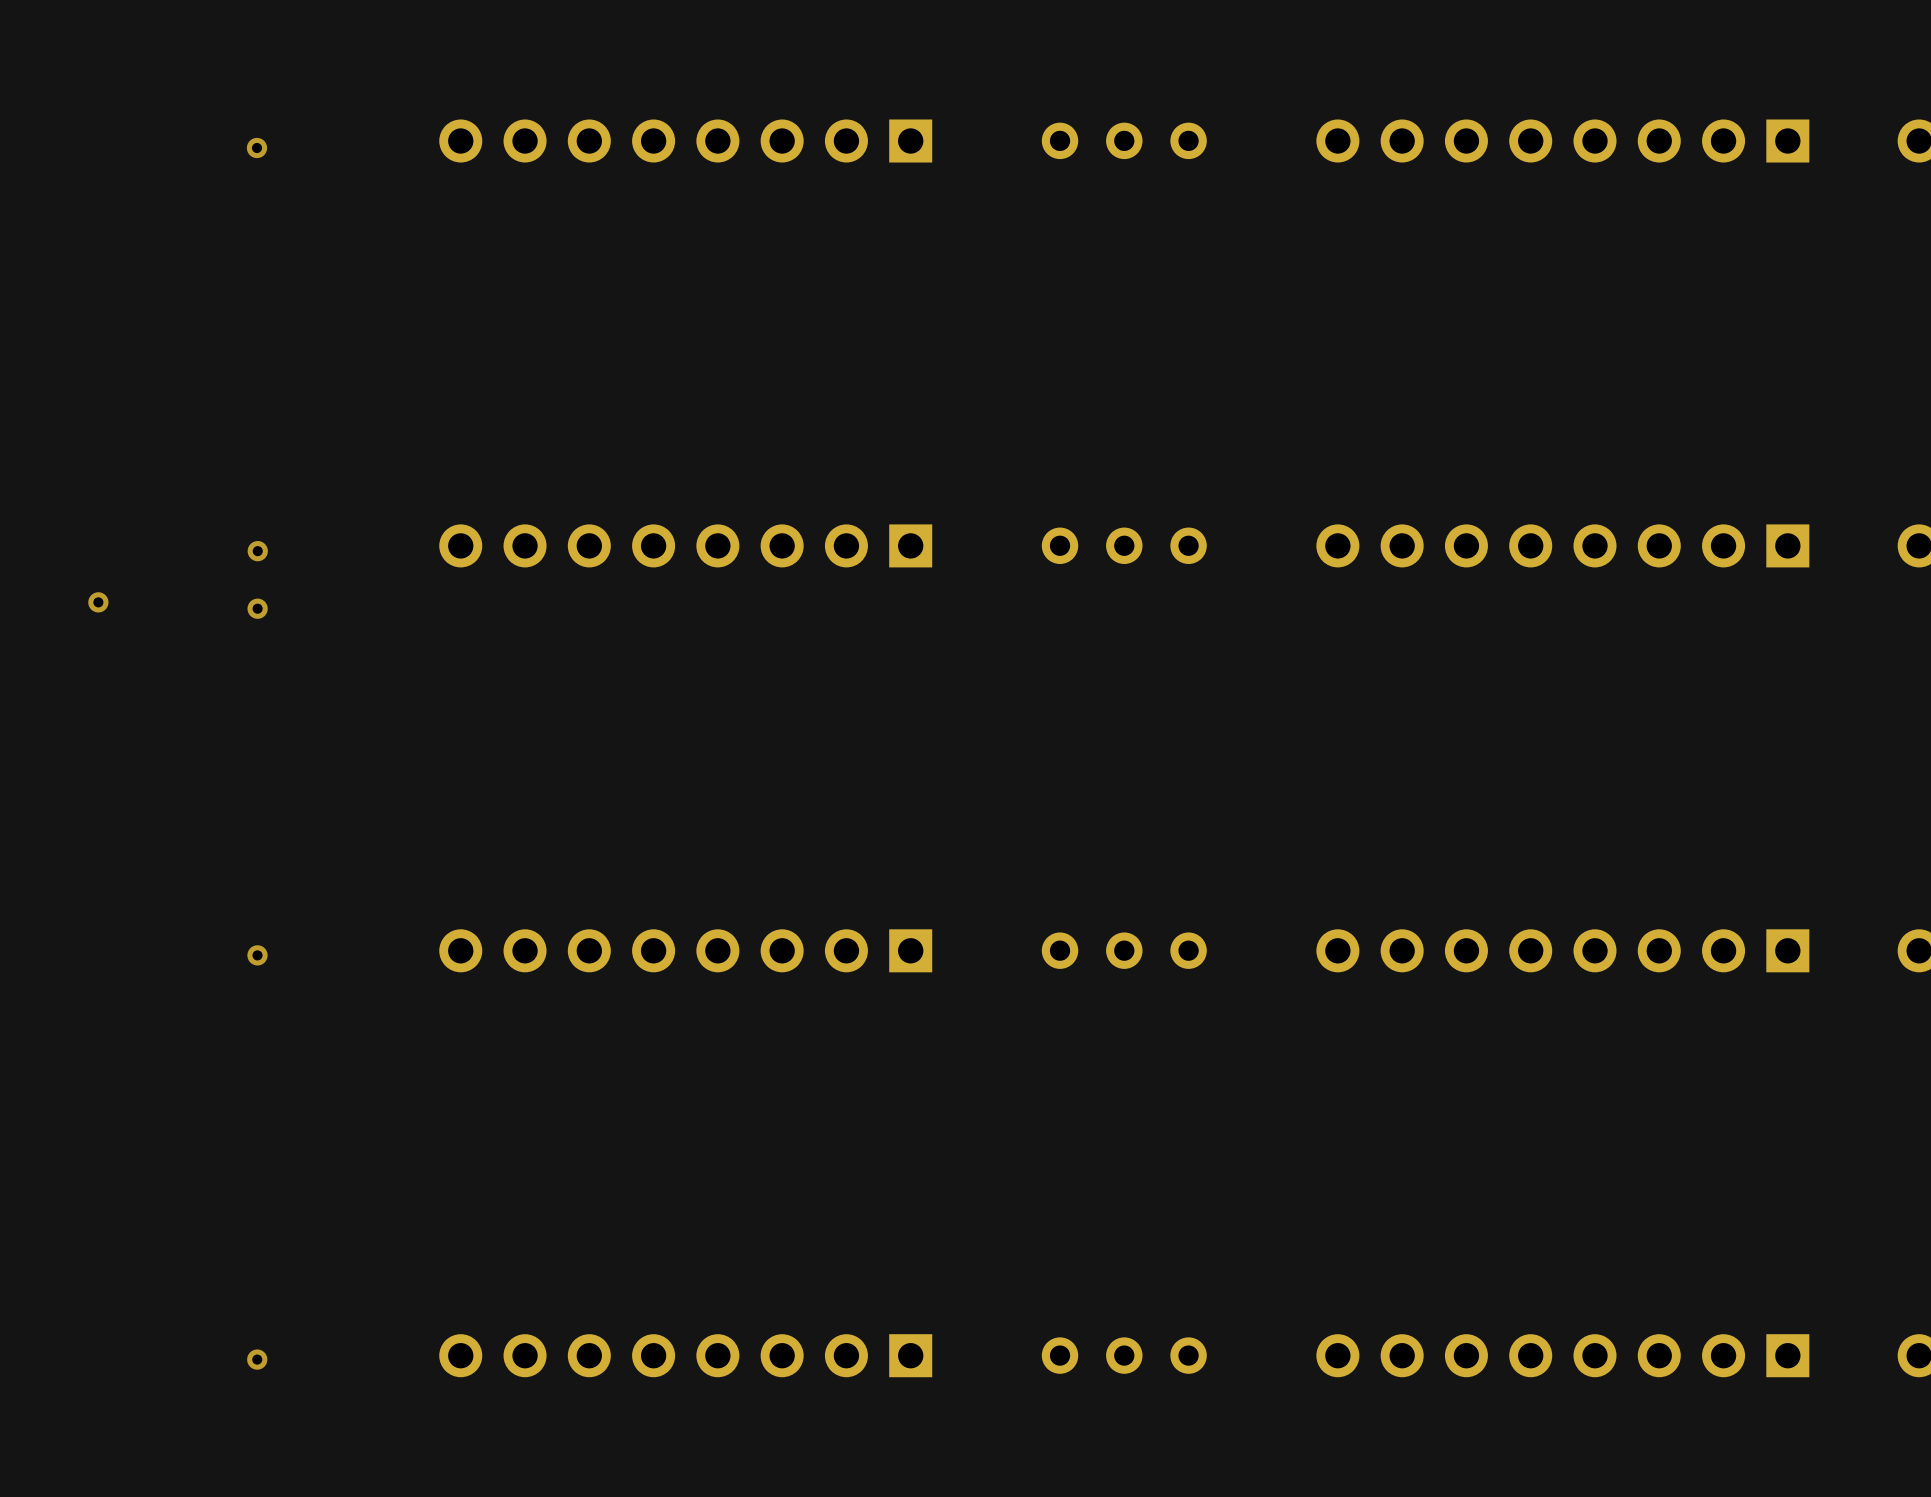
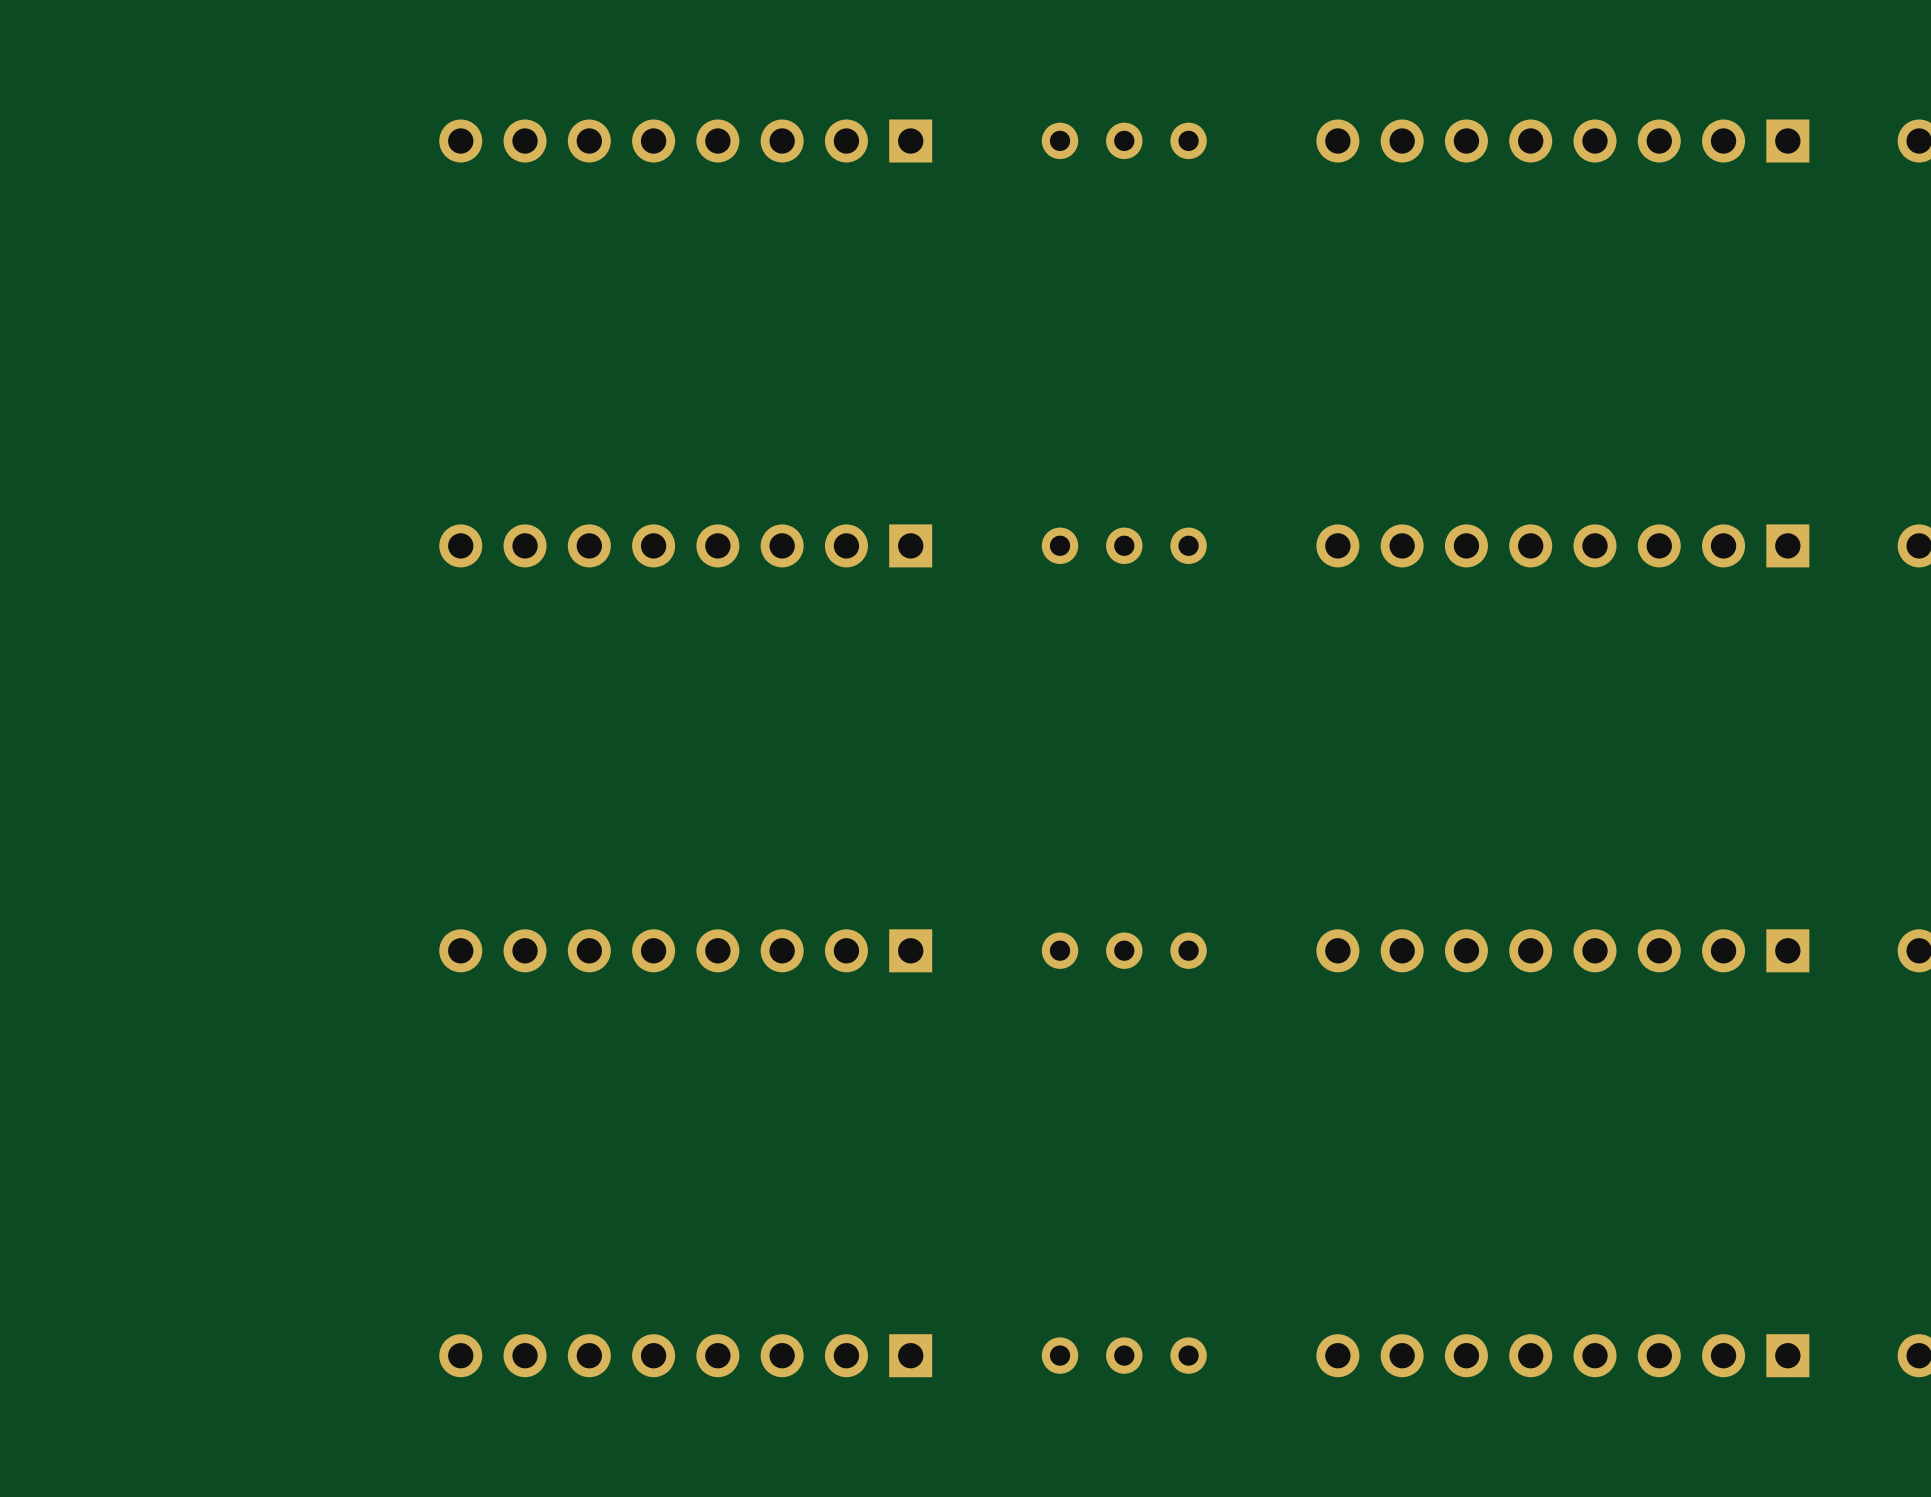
via: (256, 148) -> none
via: (257, 551) -> none
via: (98, 602) -> none
via: (257, 608) -> none
via: (257, 955) -> none
via: (257, 1359) -> none

